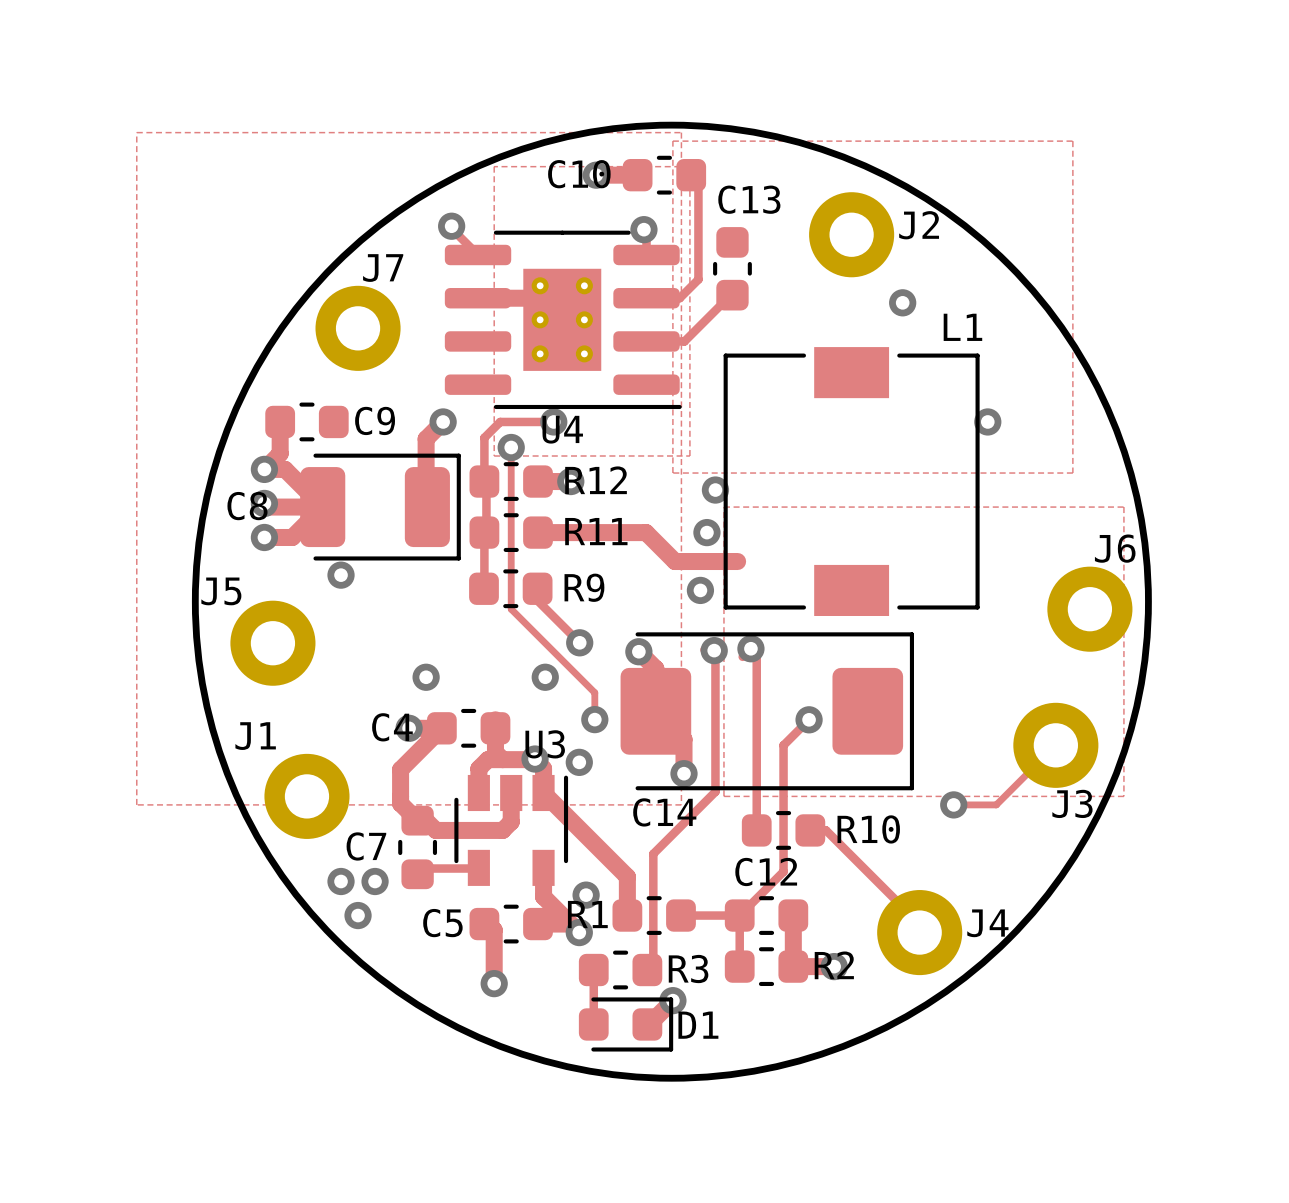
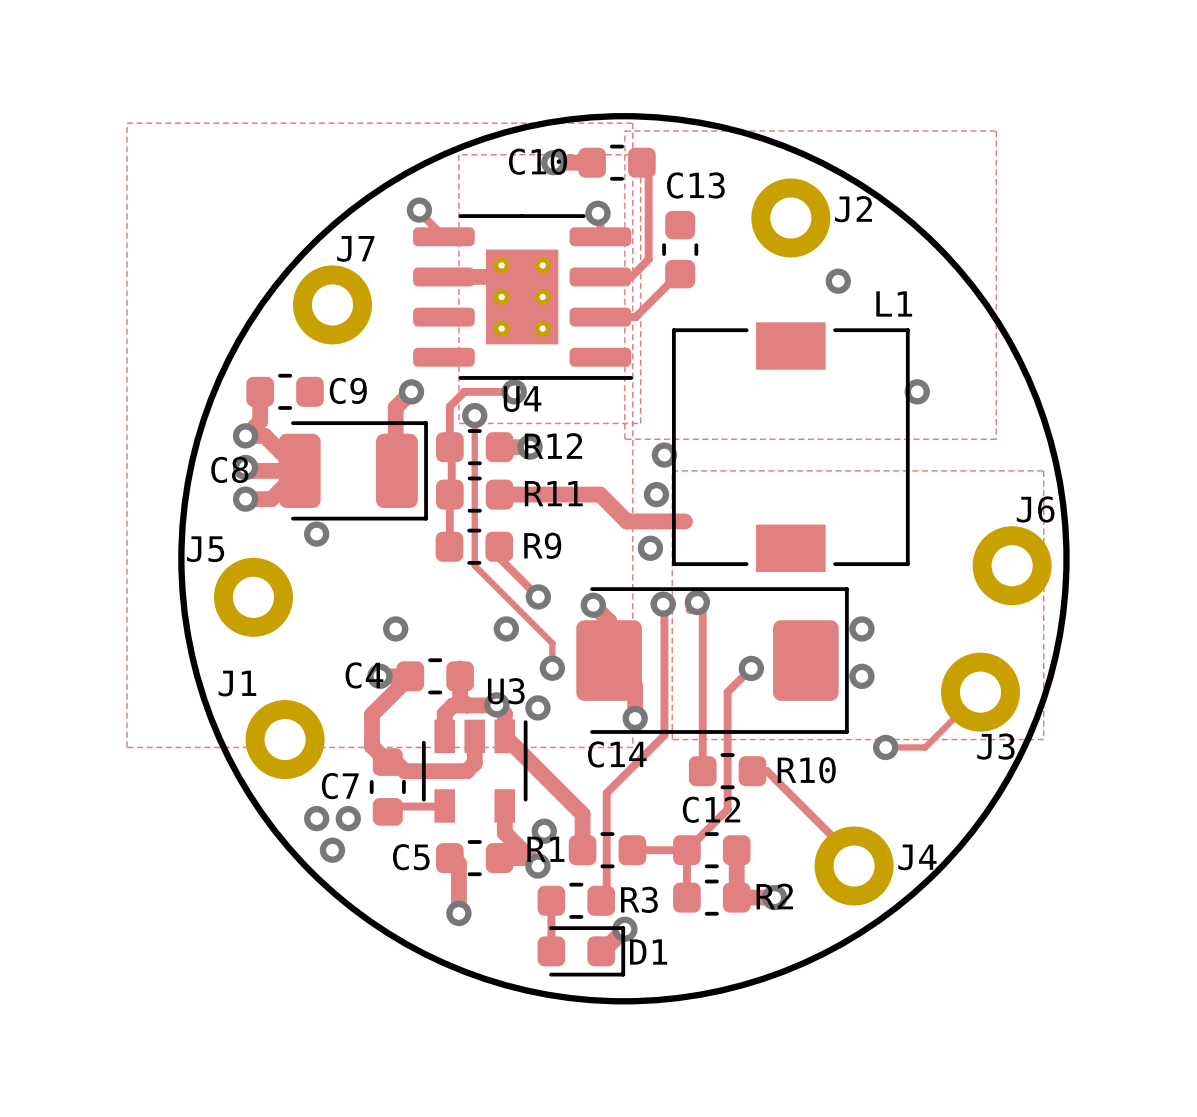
via: none -> (861, 628)
via: none -> (861, 676)

